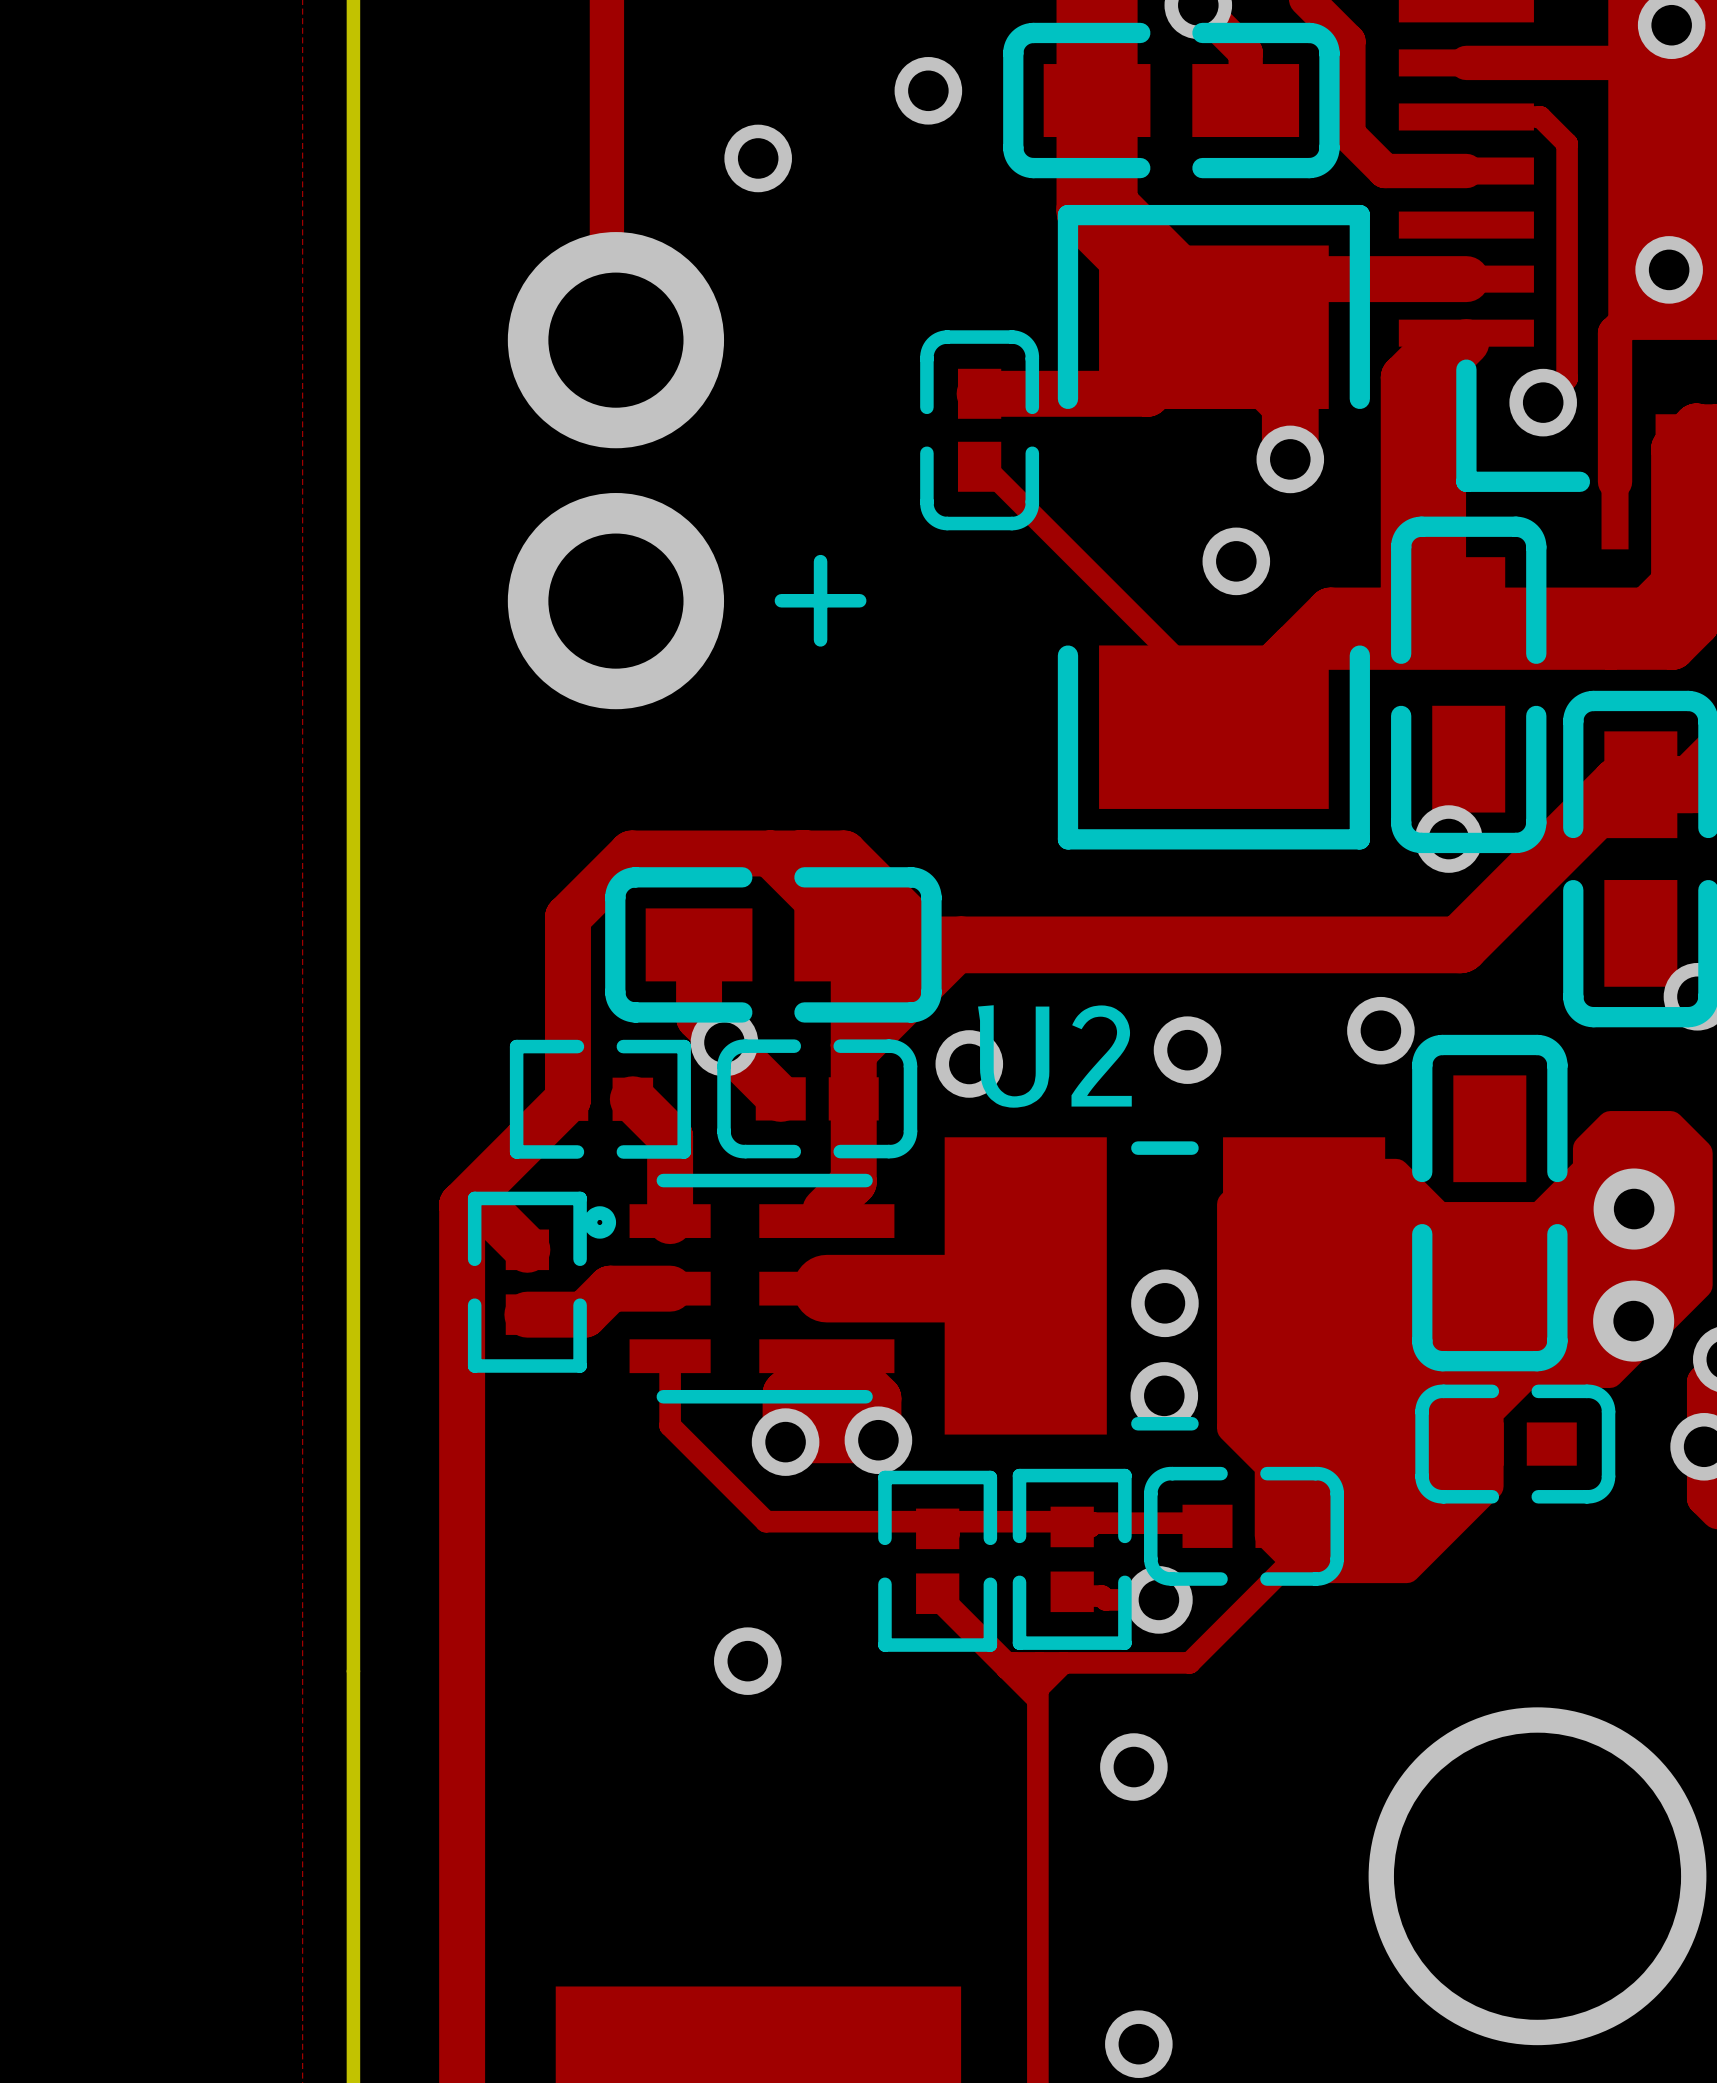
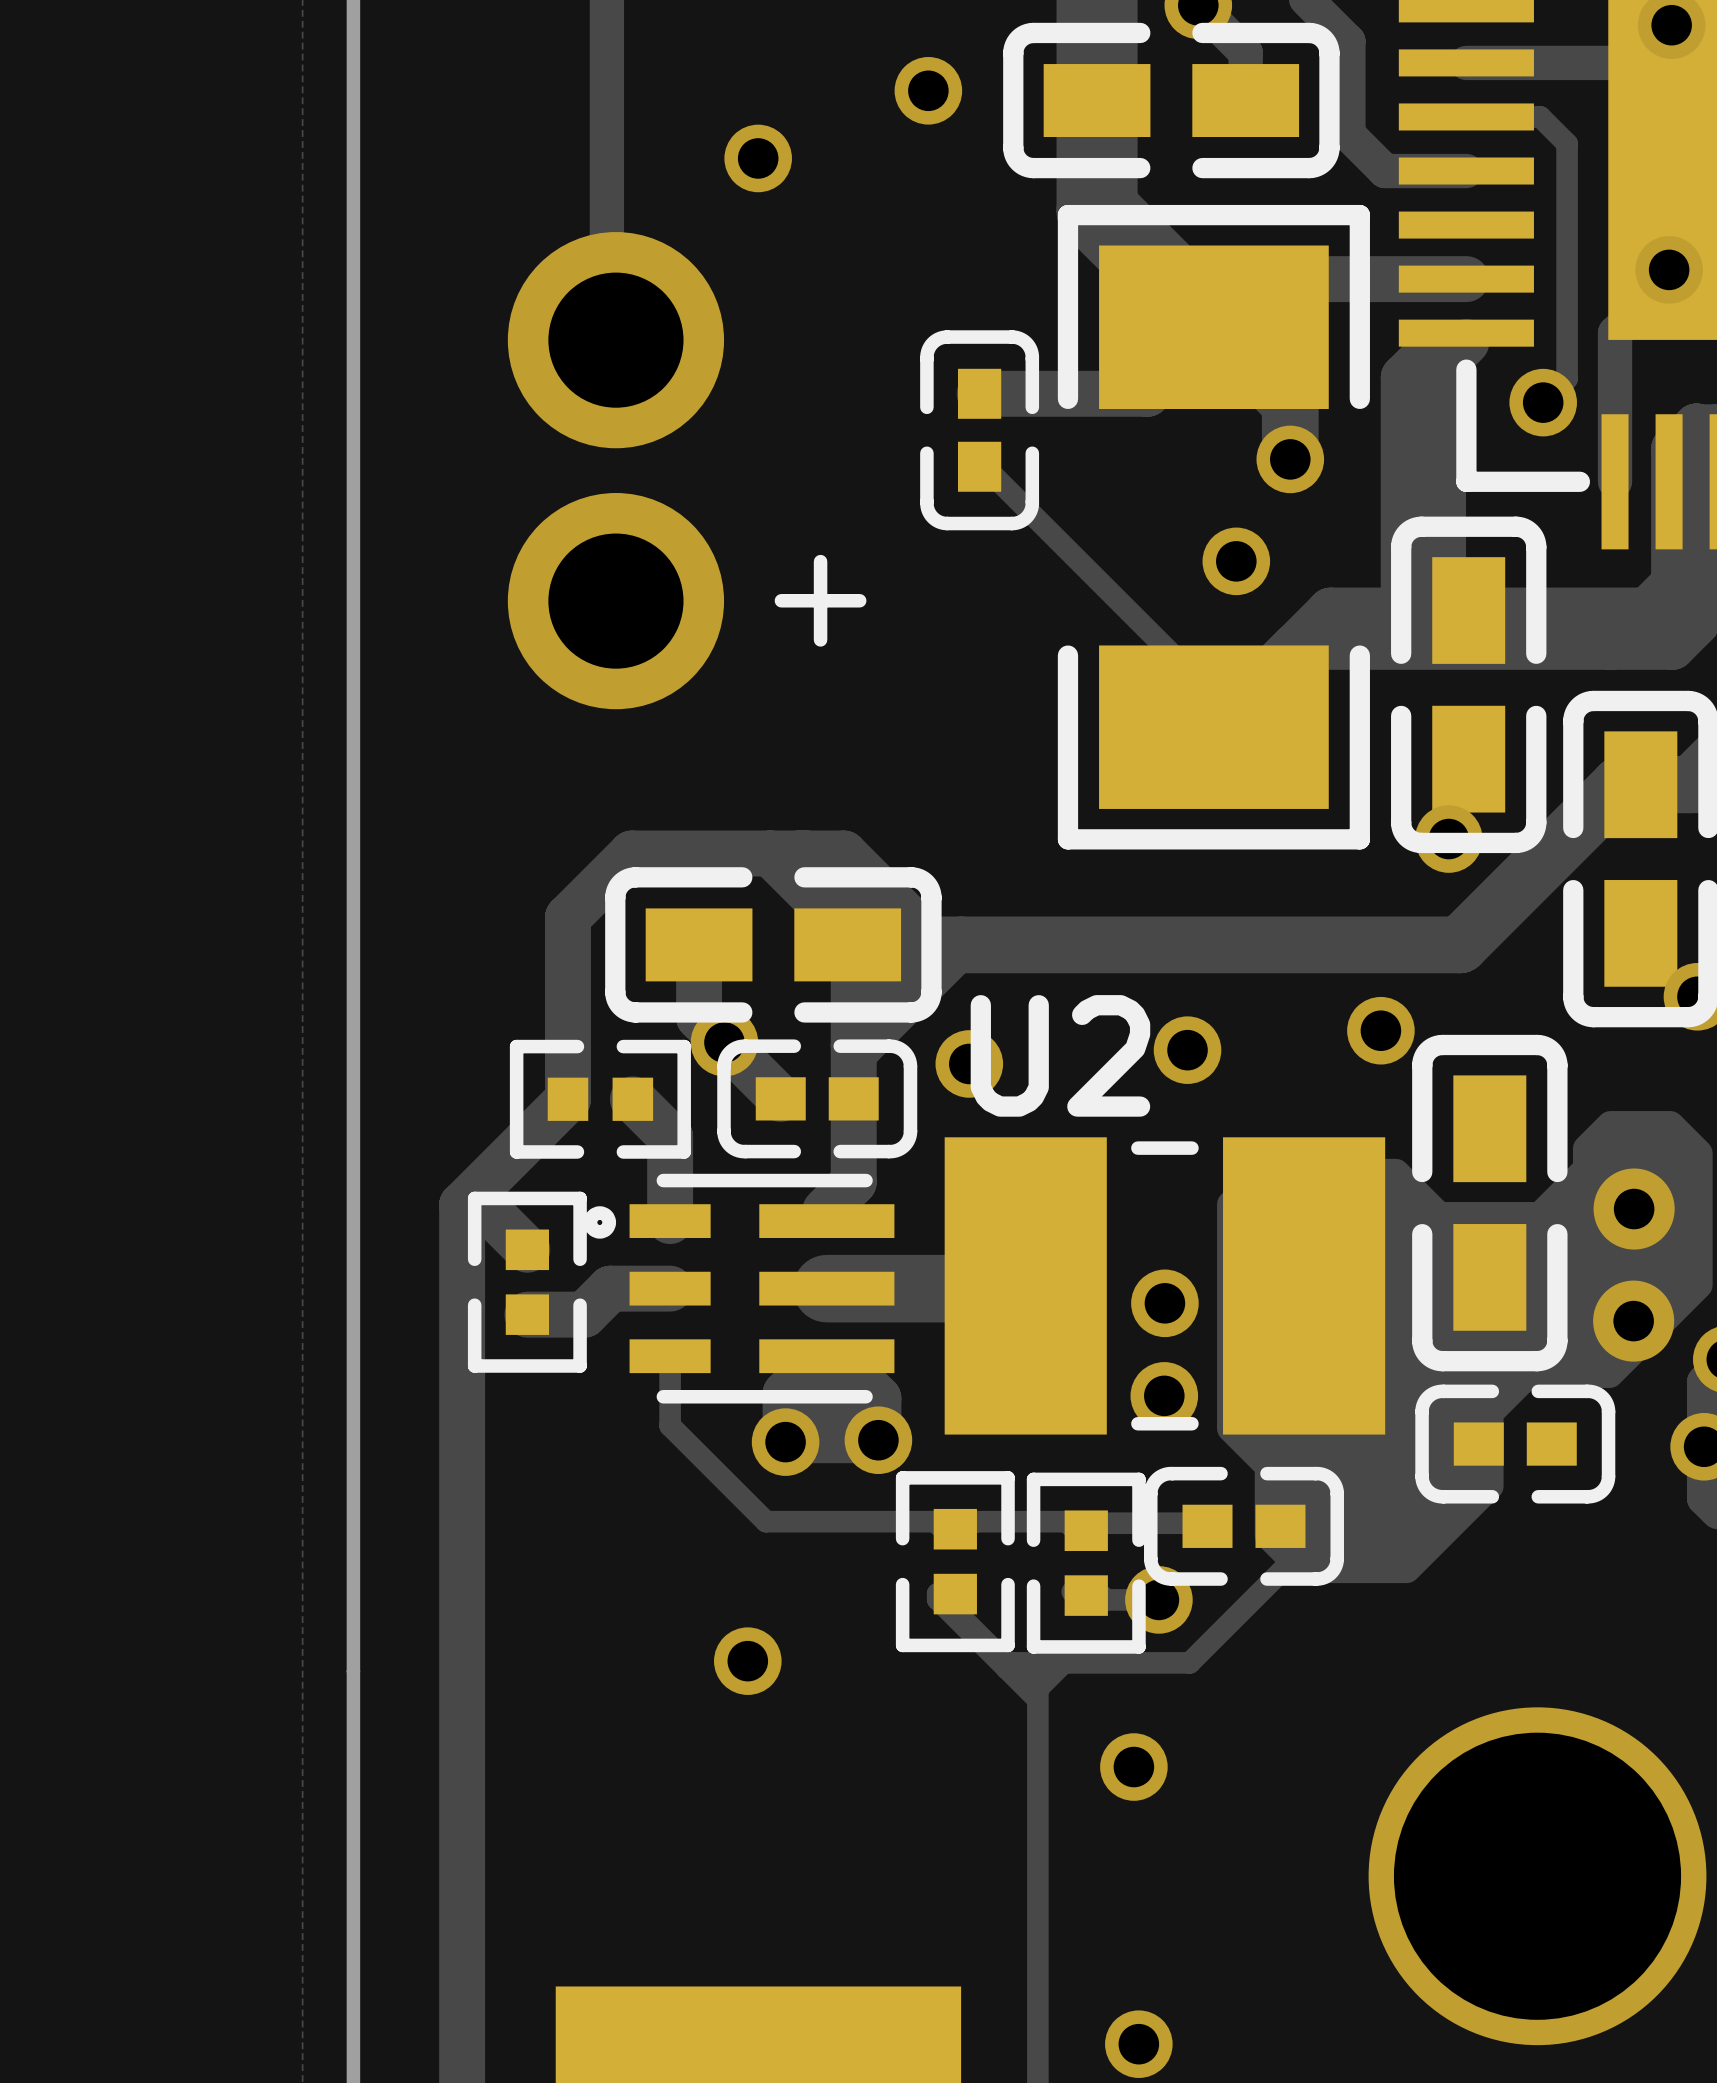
part position: (1072, 1559) -> (1086, 1563)
part position: (937, 1561) -> (955, 1561)

